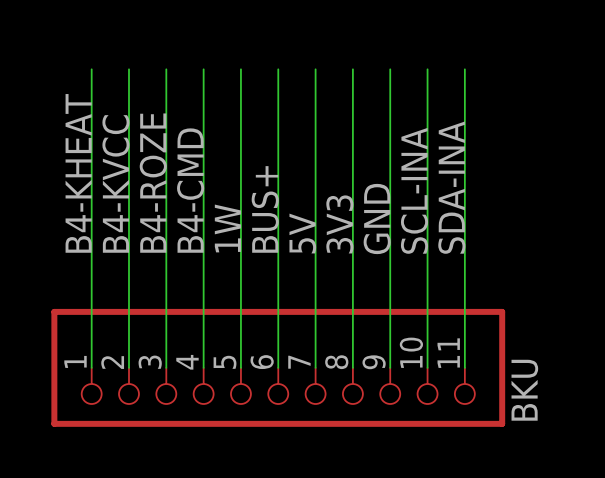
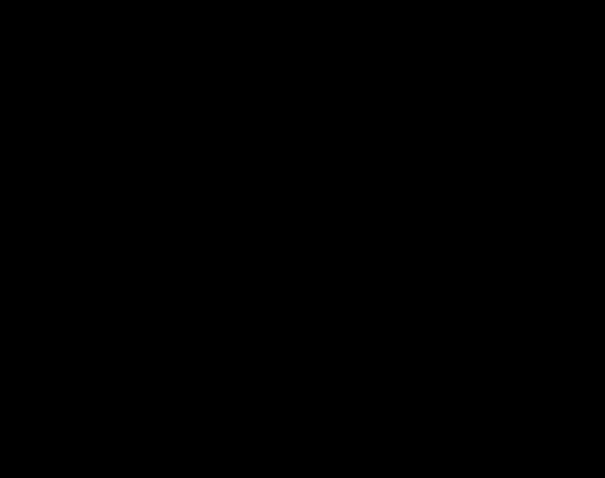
wire: (91, 69) (91, 367) -> none
wire: (129, 69) (129, 367) -> none
wire: (166, 69) (166, 367) -> none
wire: (203, 69) (203, 367) -> none
wire: (240, 69) (240, 367) -> none
wire: (278, 69) (278, 367) -> none
wire: (315, 69) (315, 367) -> none
wire: (352, 69) (352, 367) -> none
wire: (390, 69) (390, 367) -> none
wire: (427, 69) (427, 367) -> none
wire: (464, 69) (464, 367) -> none
label: B4-KHEAT (78, 173) -> none
label: B4-KVCC (115, 183) -> none
label: B4-ROZE (153, 183) -> none
label: SDA-INA (451, 187) -> none
label: B4-CMD (190, 190) -> none
label: SCL-INA (414, 190) -> none
label: BUS+ (265, 209) -> none
label: GND (377, 219) -> none
label: 3V3 (339, 224) -> none
label: 1W (227, 228) -> none
label: 5V (302, 233) -> none
BKU: (278, 367) -> none

